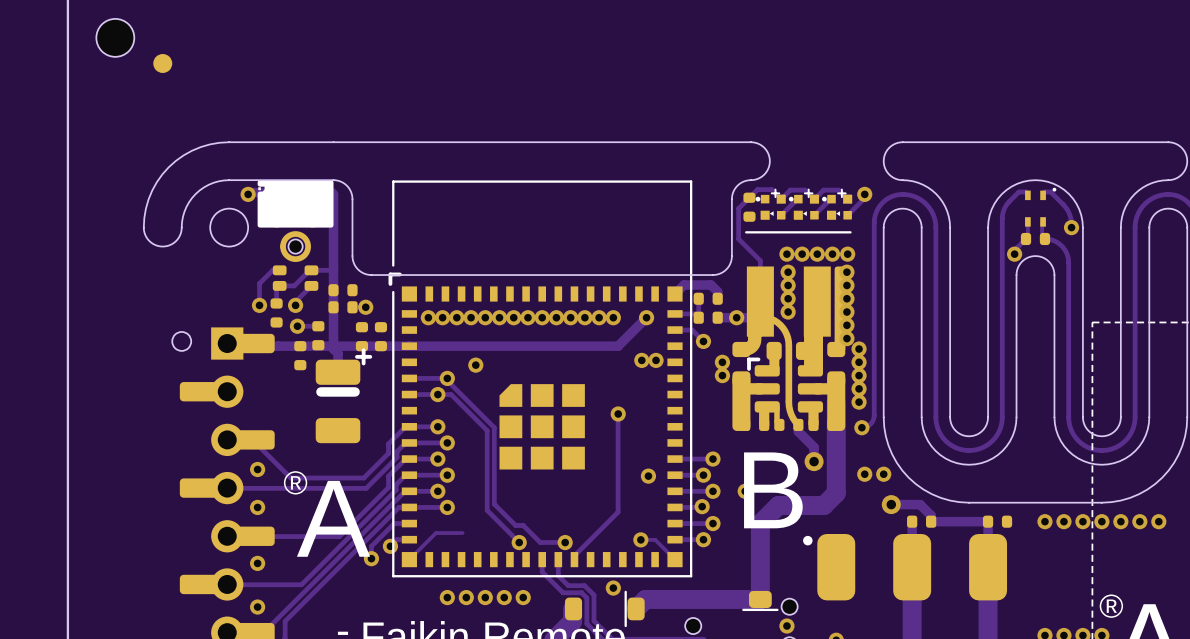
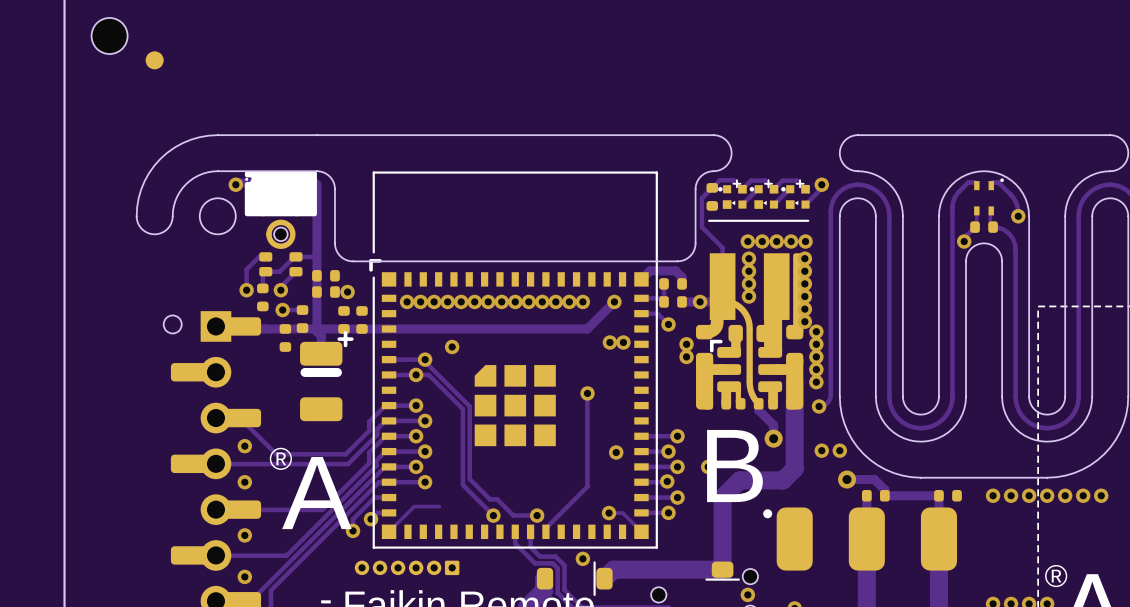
part: none -> (362, 567)
part: none -> (380, 567)
part: none -> (398, 567)
part: none -> (416, 567)
via: (447, 597) -> none
part: none -> (434, 567)
via: (466, 597) -> none
part: none -> (452, 567)
via: (485, 597) -> none
via: (504, 597) -> none
via: (523, 597) -> none

